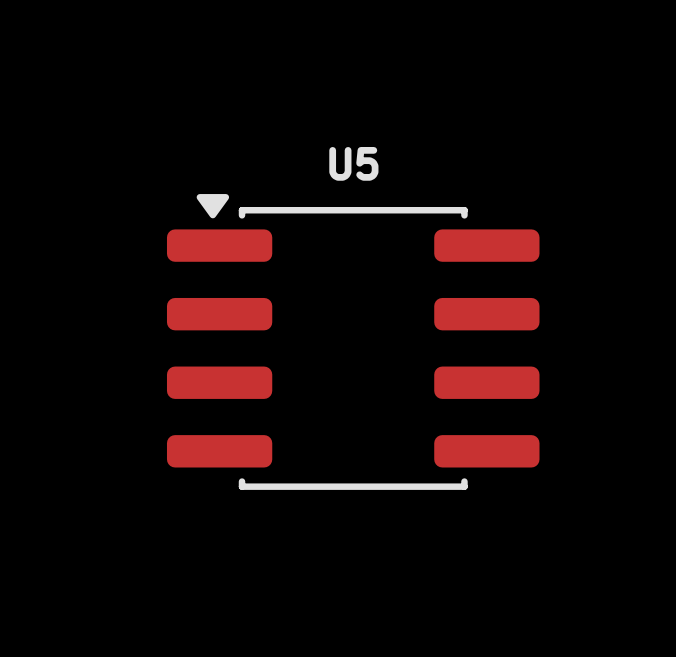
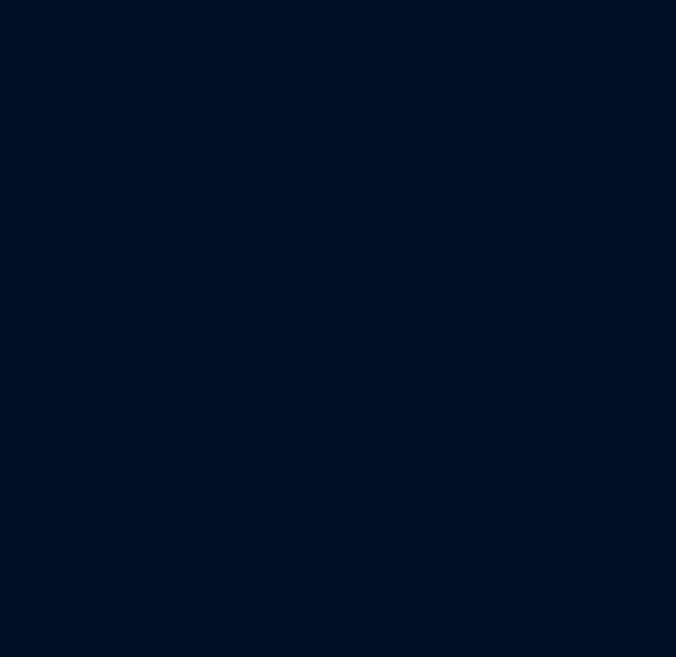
U5: (353, 341) -> none

